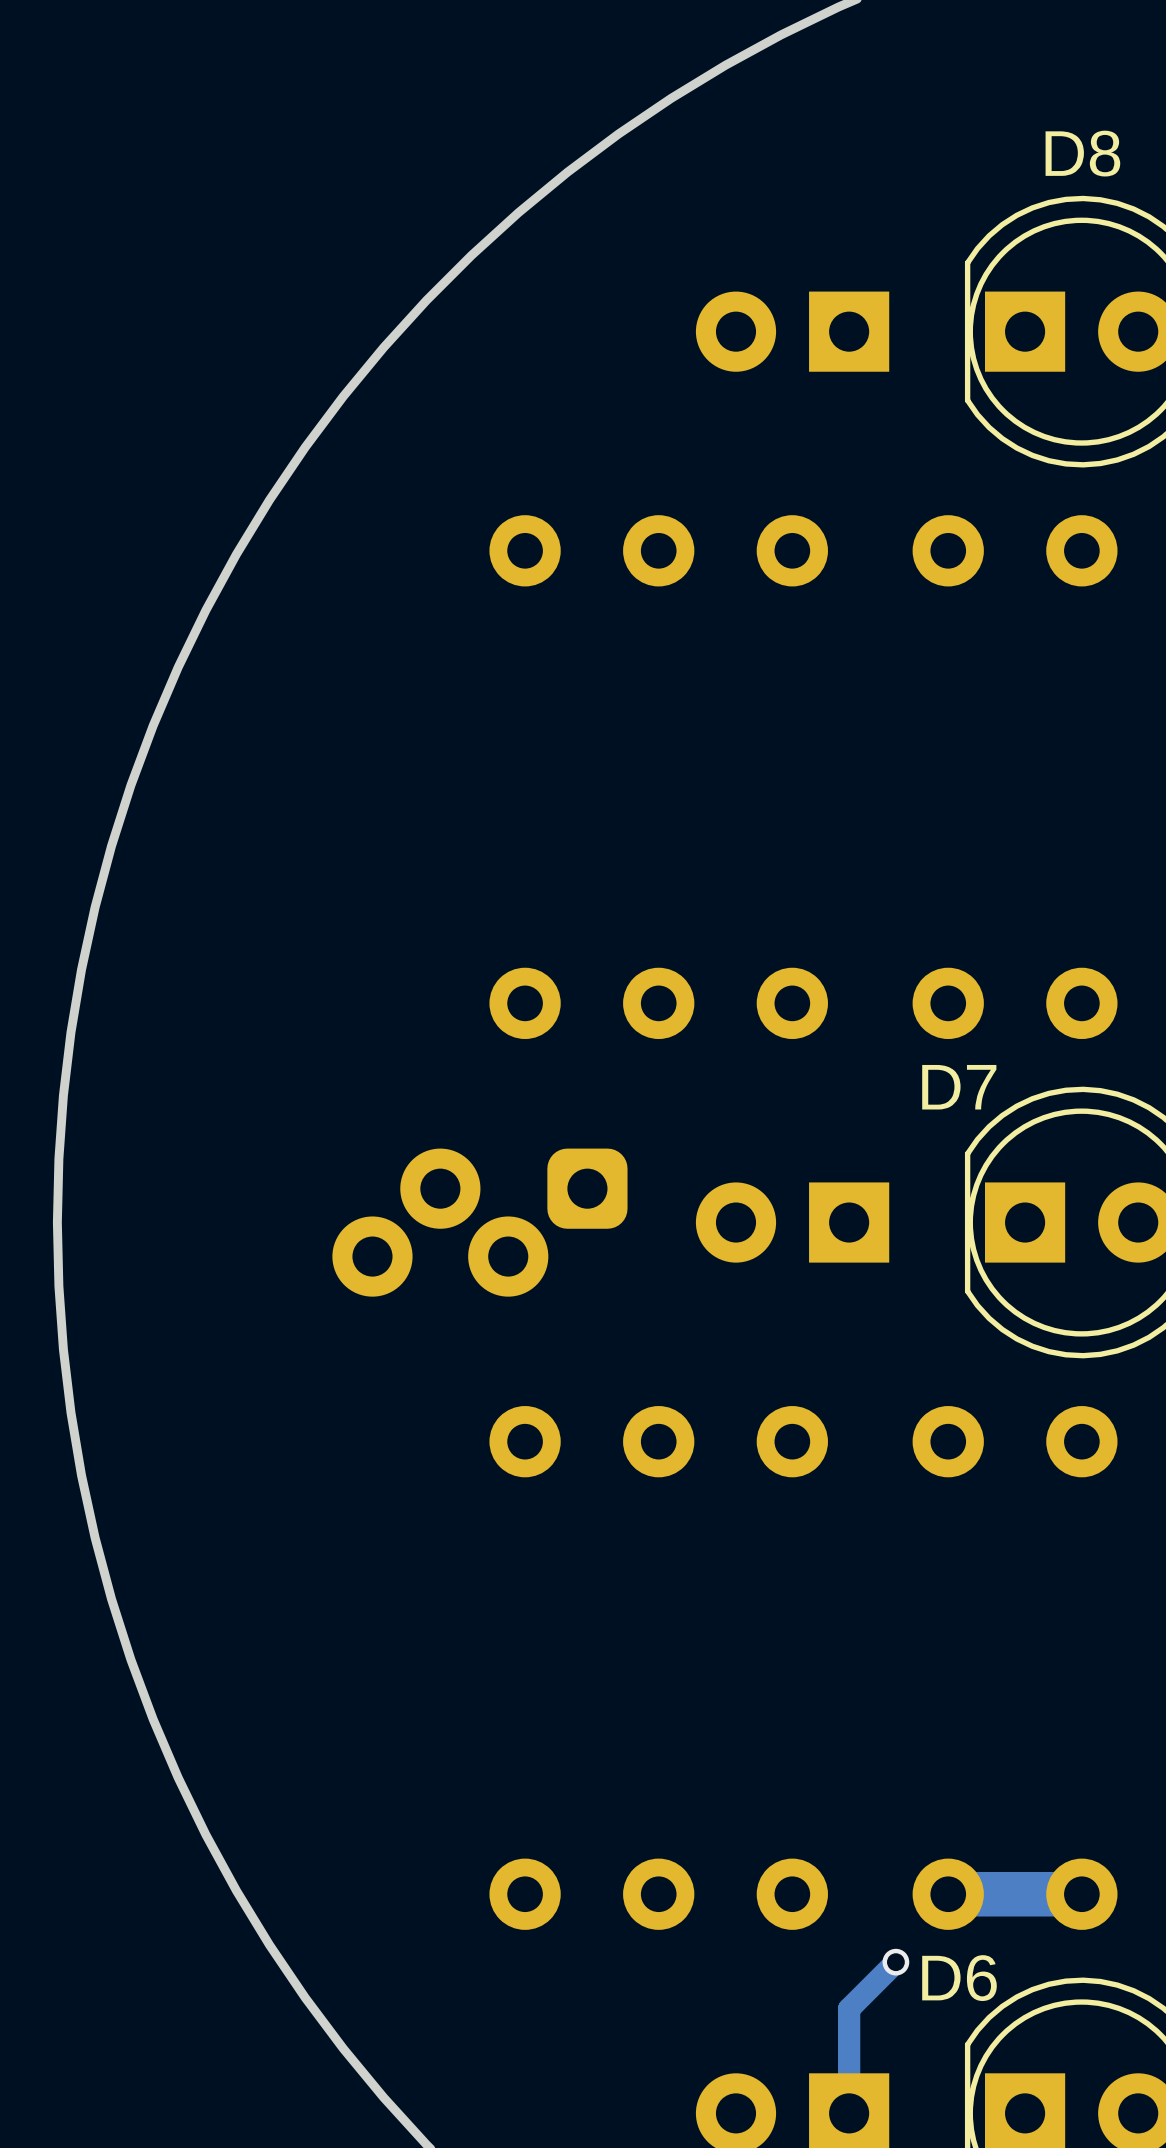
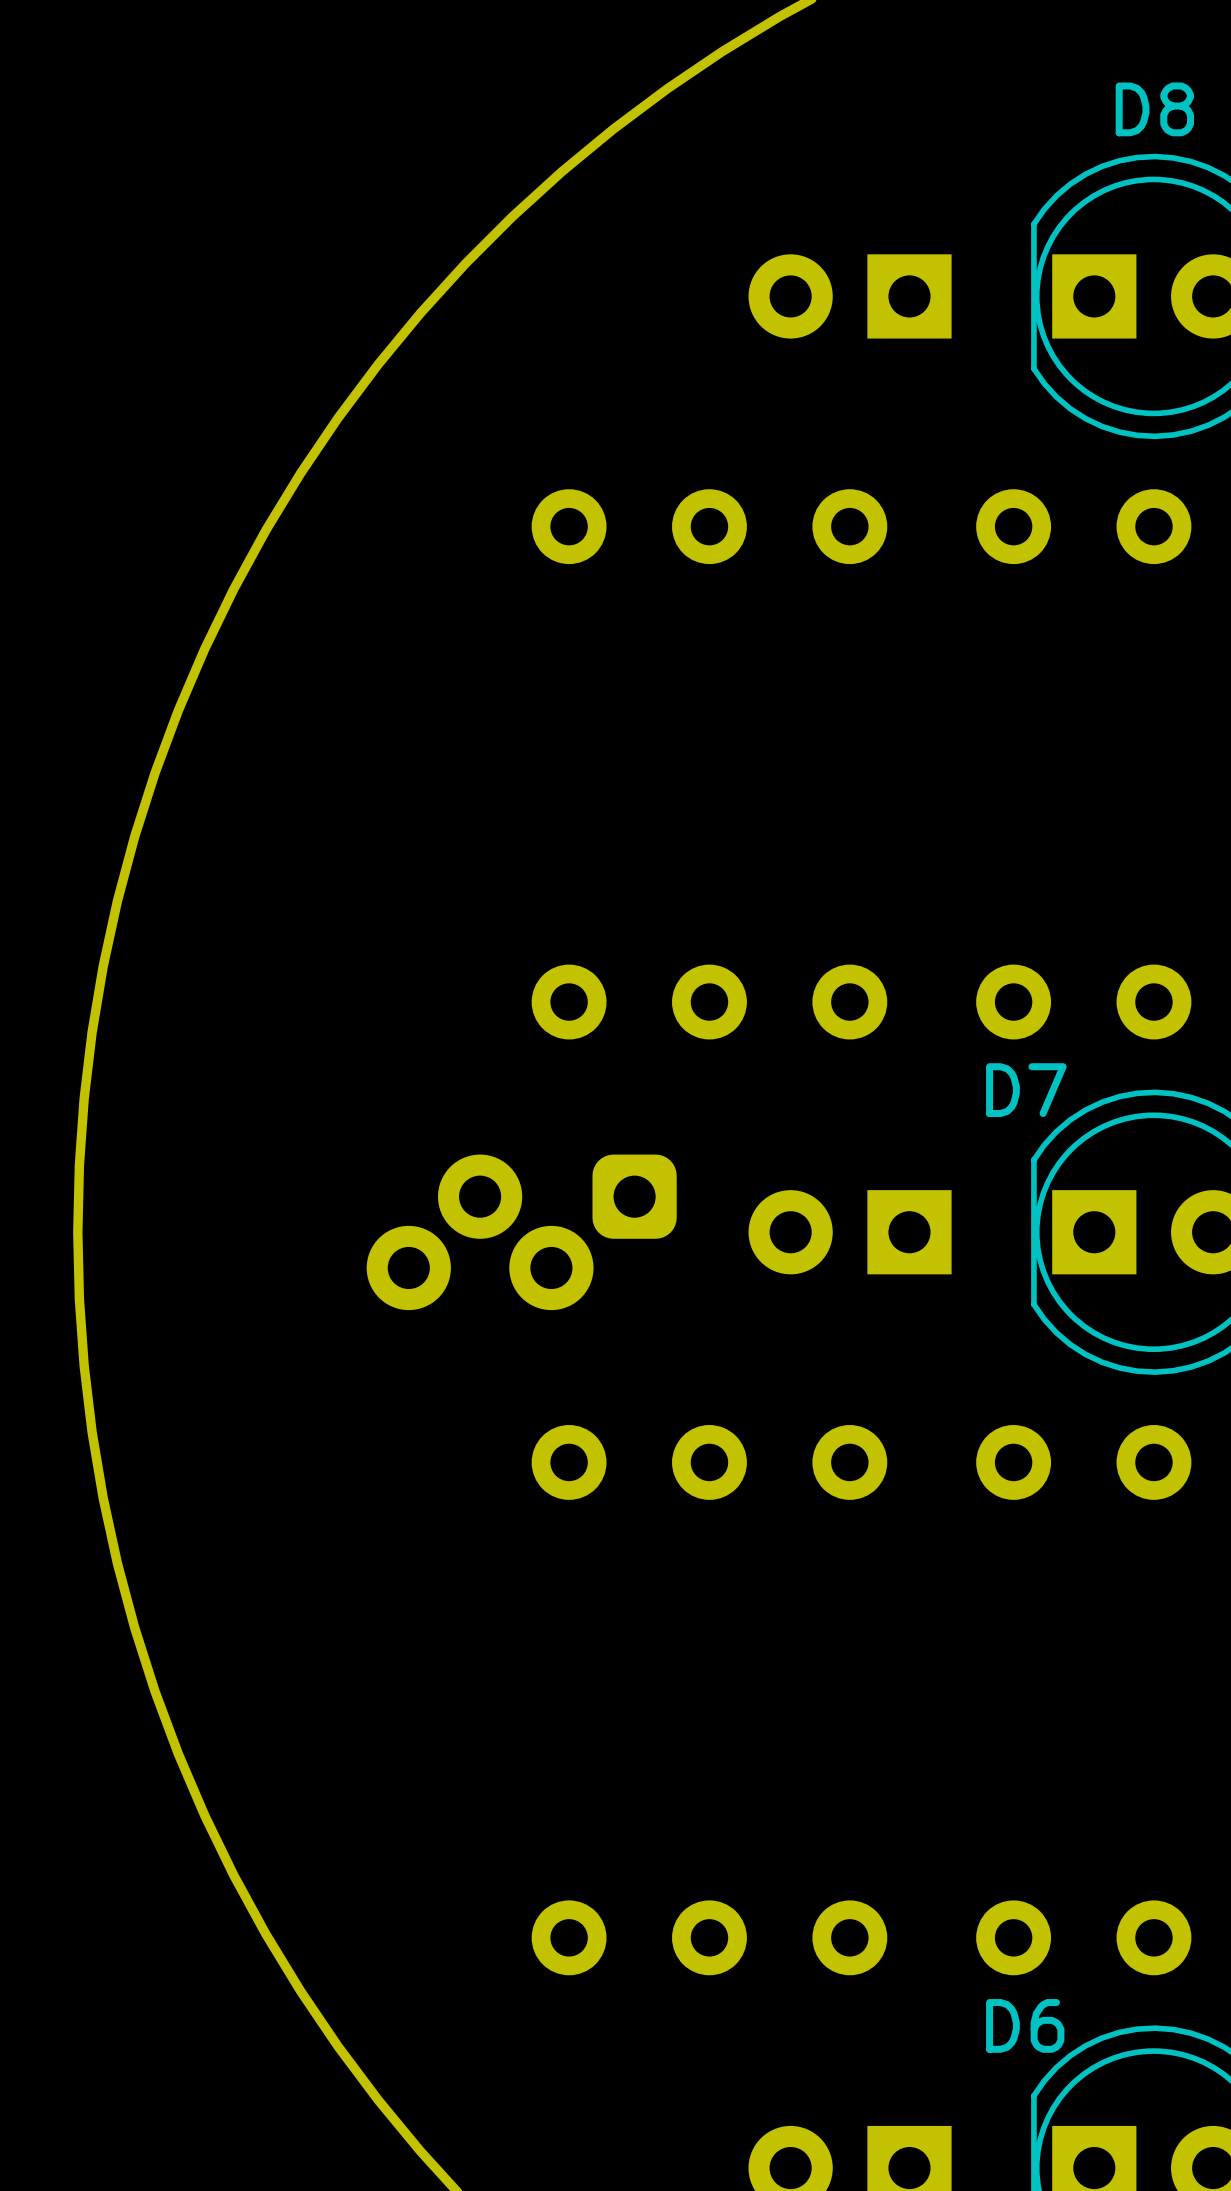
track: (1081, 1894) (948, 1894) -> none
track: (895, 1962) (849, 2008) (849, 2113) -> none
via: (895, 1962) -> none

